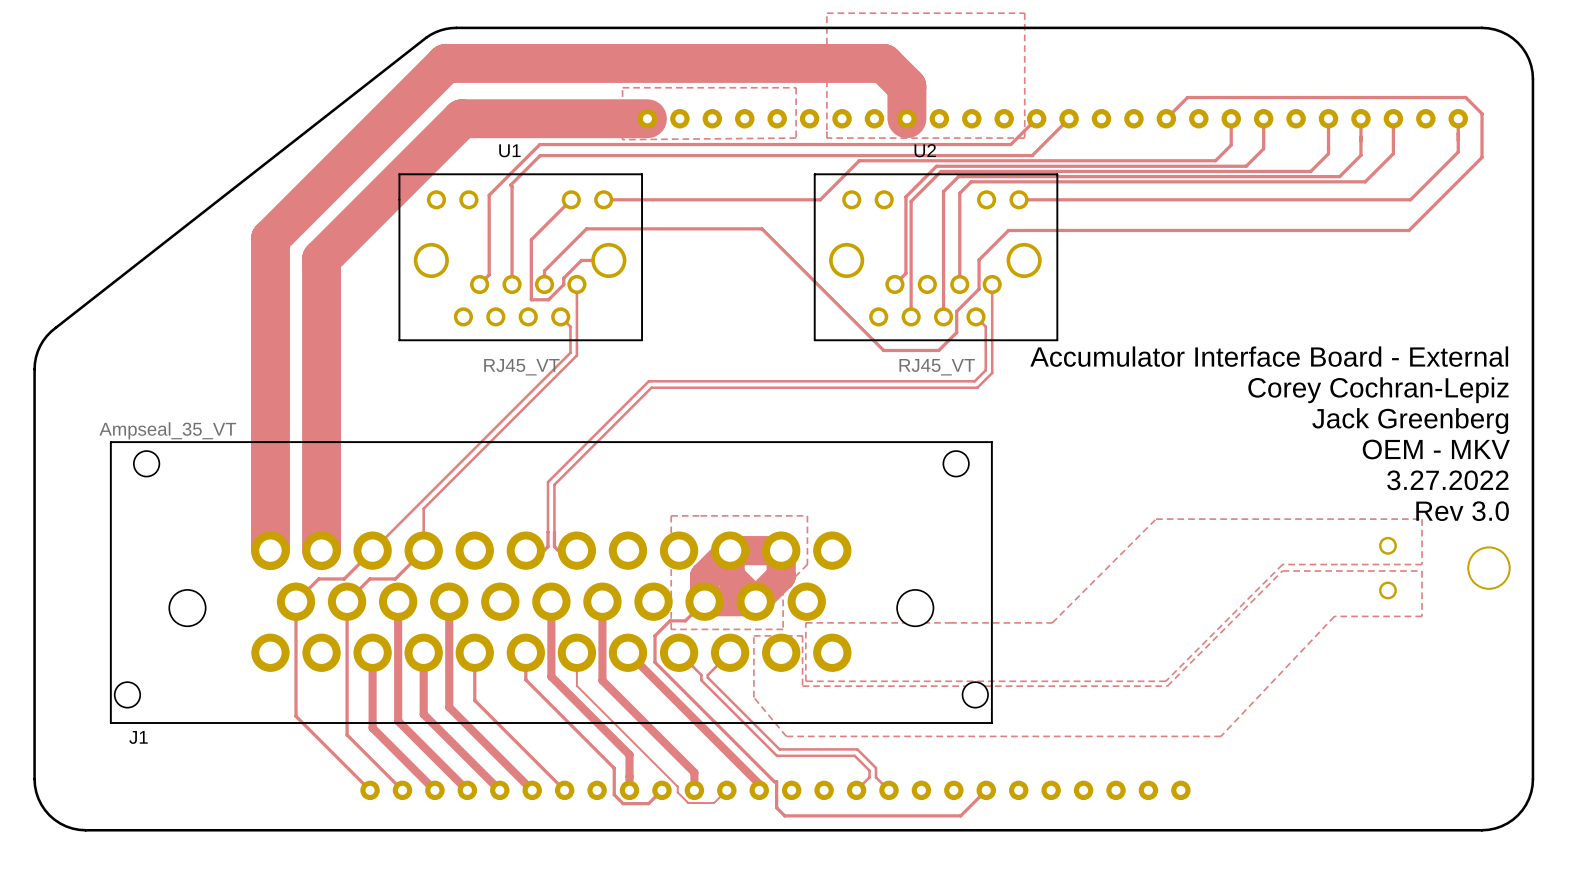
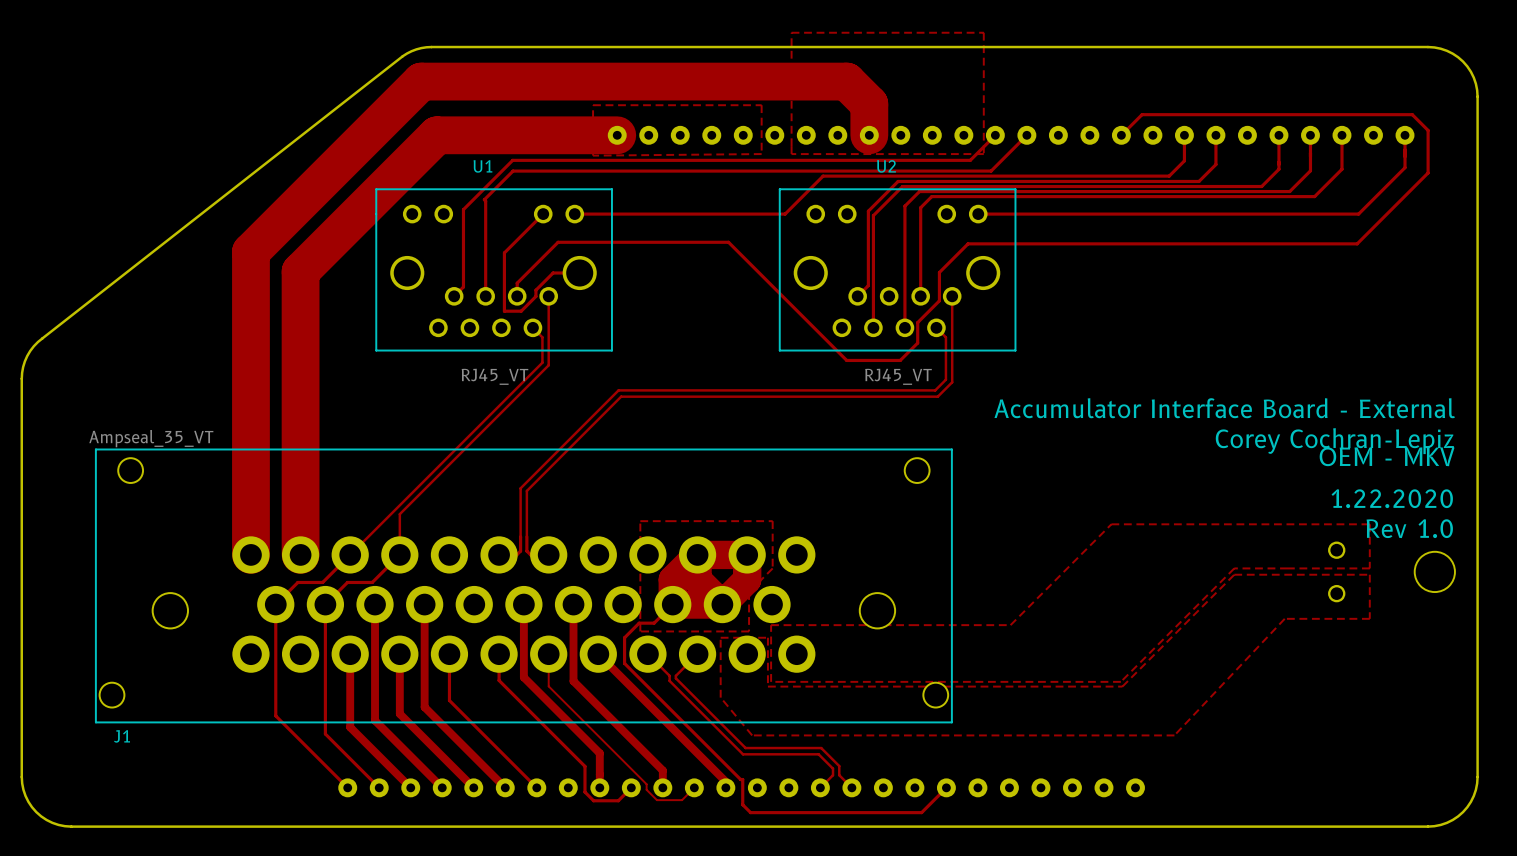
text position: Accumulator Interface Board - External (1269, 356) -> Accumulator Interface Board - External (1224, 408)
text position: Corey Cochran-Lepiz (1378, 390) -> Corey Cochran-Lepiz (1334, 441)
text: Jack Greenberg (1410, 421) -> none
text: 3.27.2022 (1447, 480) -> 1.22.2020 (1392, 498)
text: Rev 3.0 (1462, 511) -> Rev 1.0 (1409, 528)

